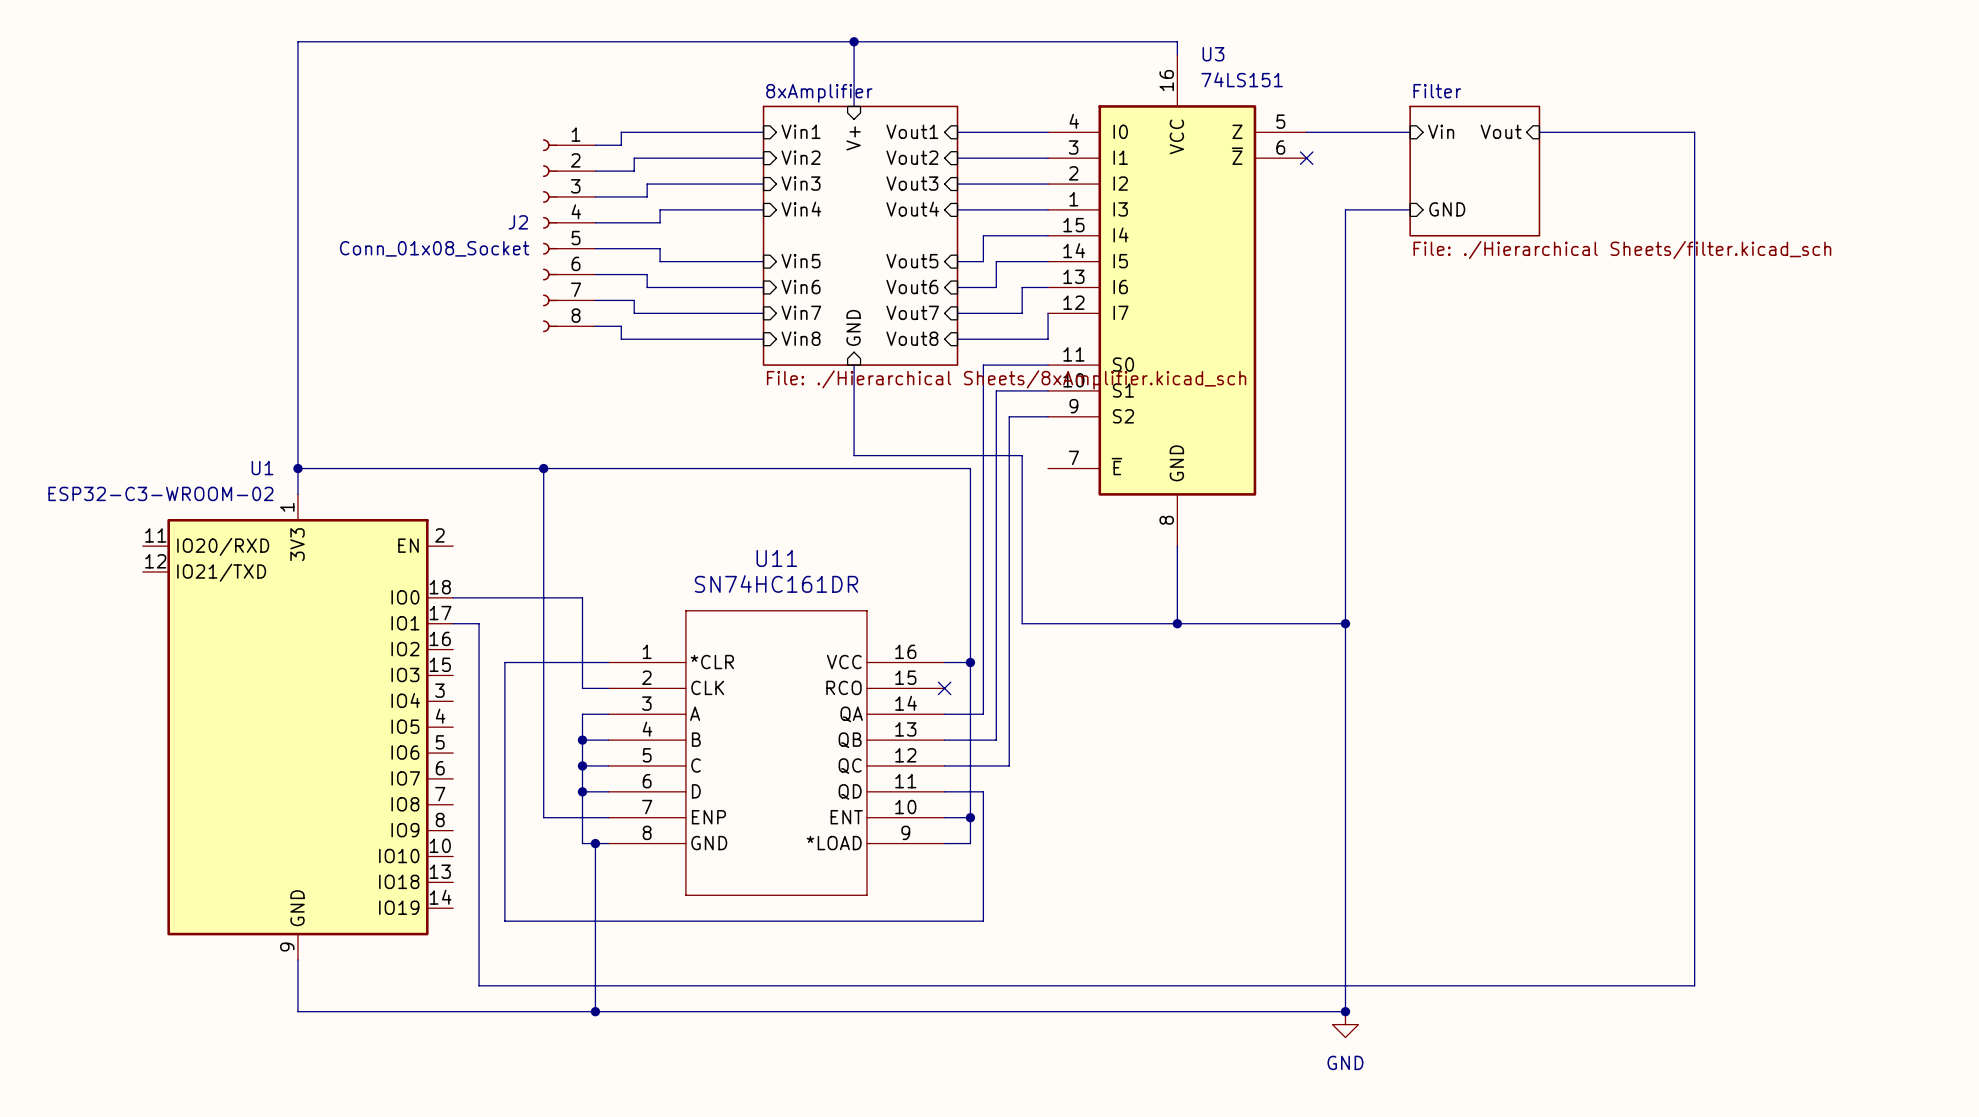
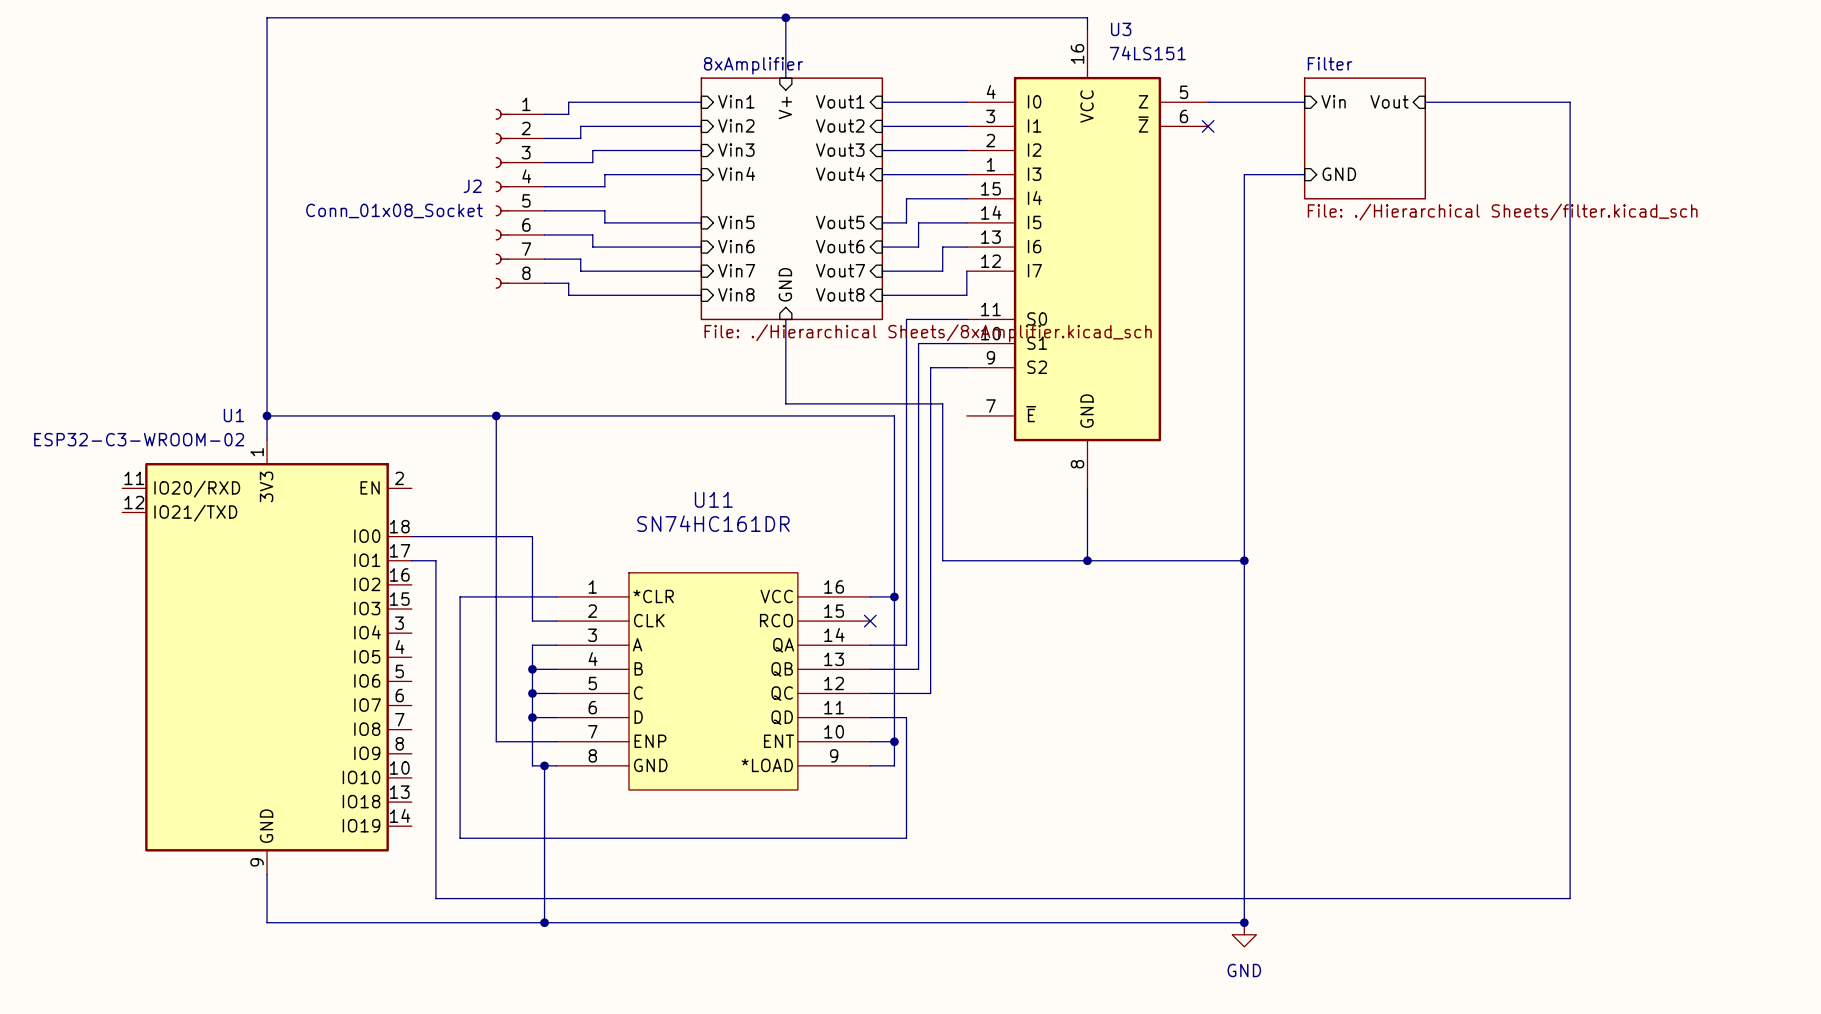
U11 symbol: [608, 610, 945, 896] -> [556, 572, 871, 790]

